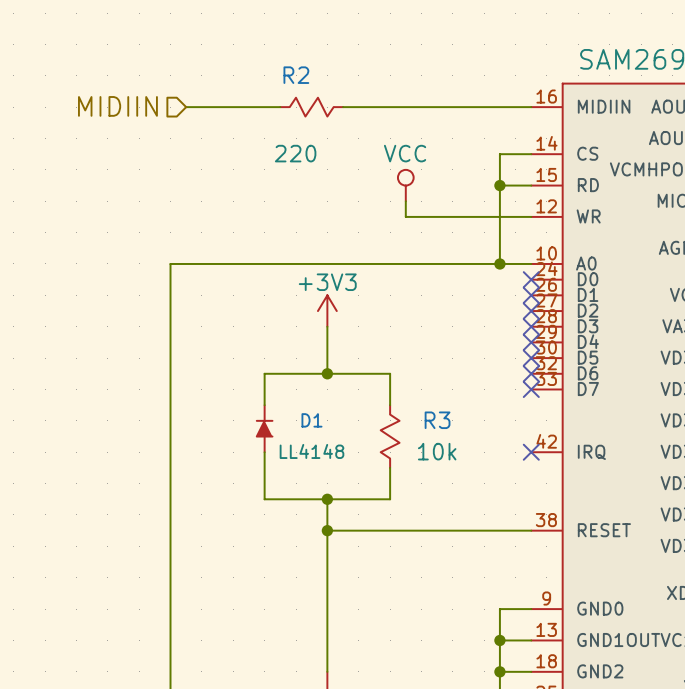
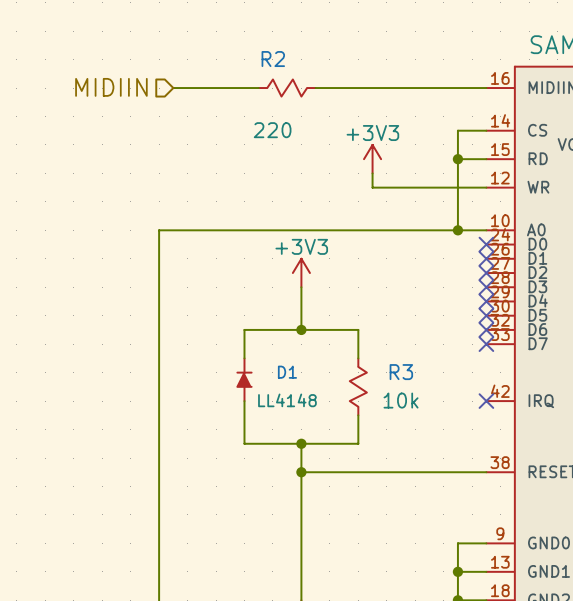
power symbol: VCC (405, 185) -> +3V3 (372, 159)

